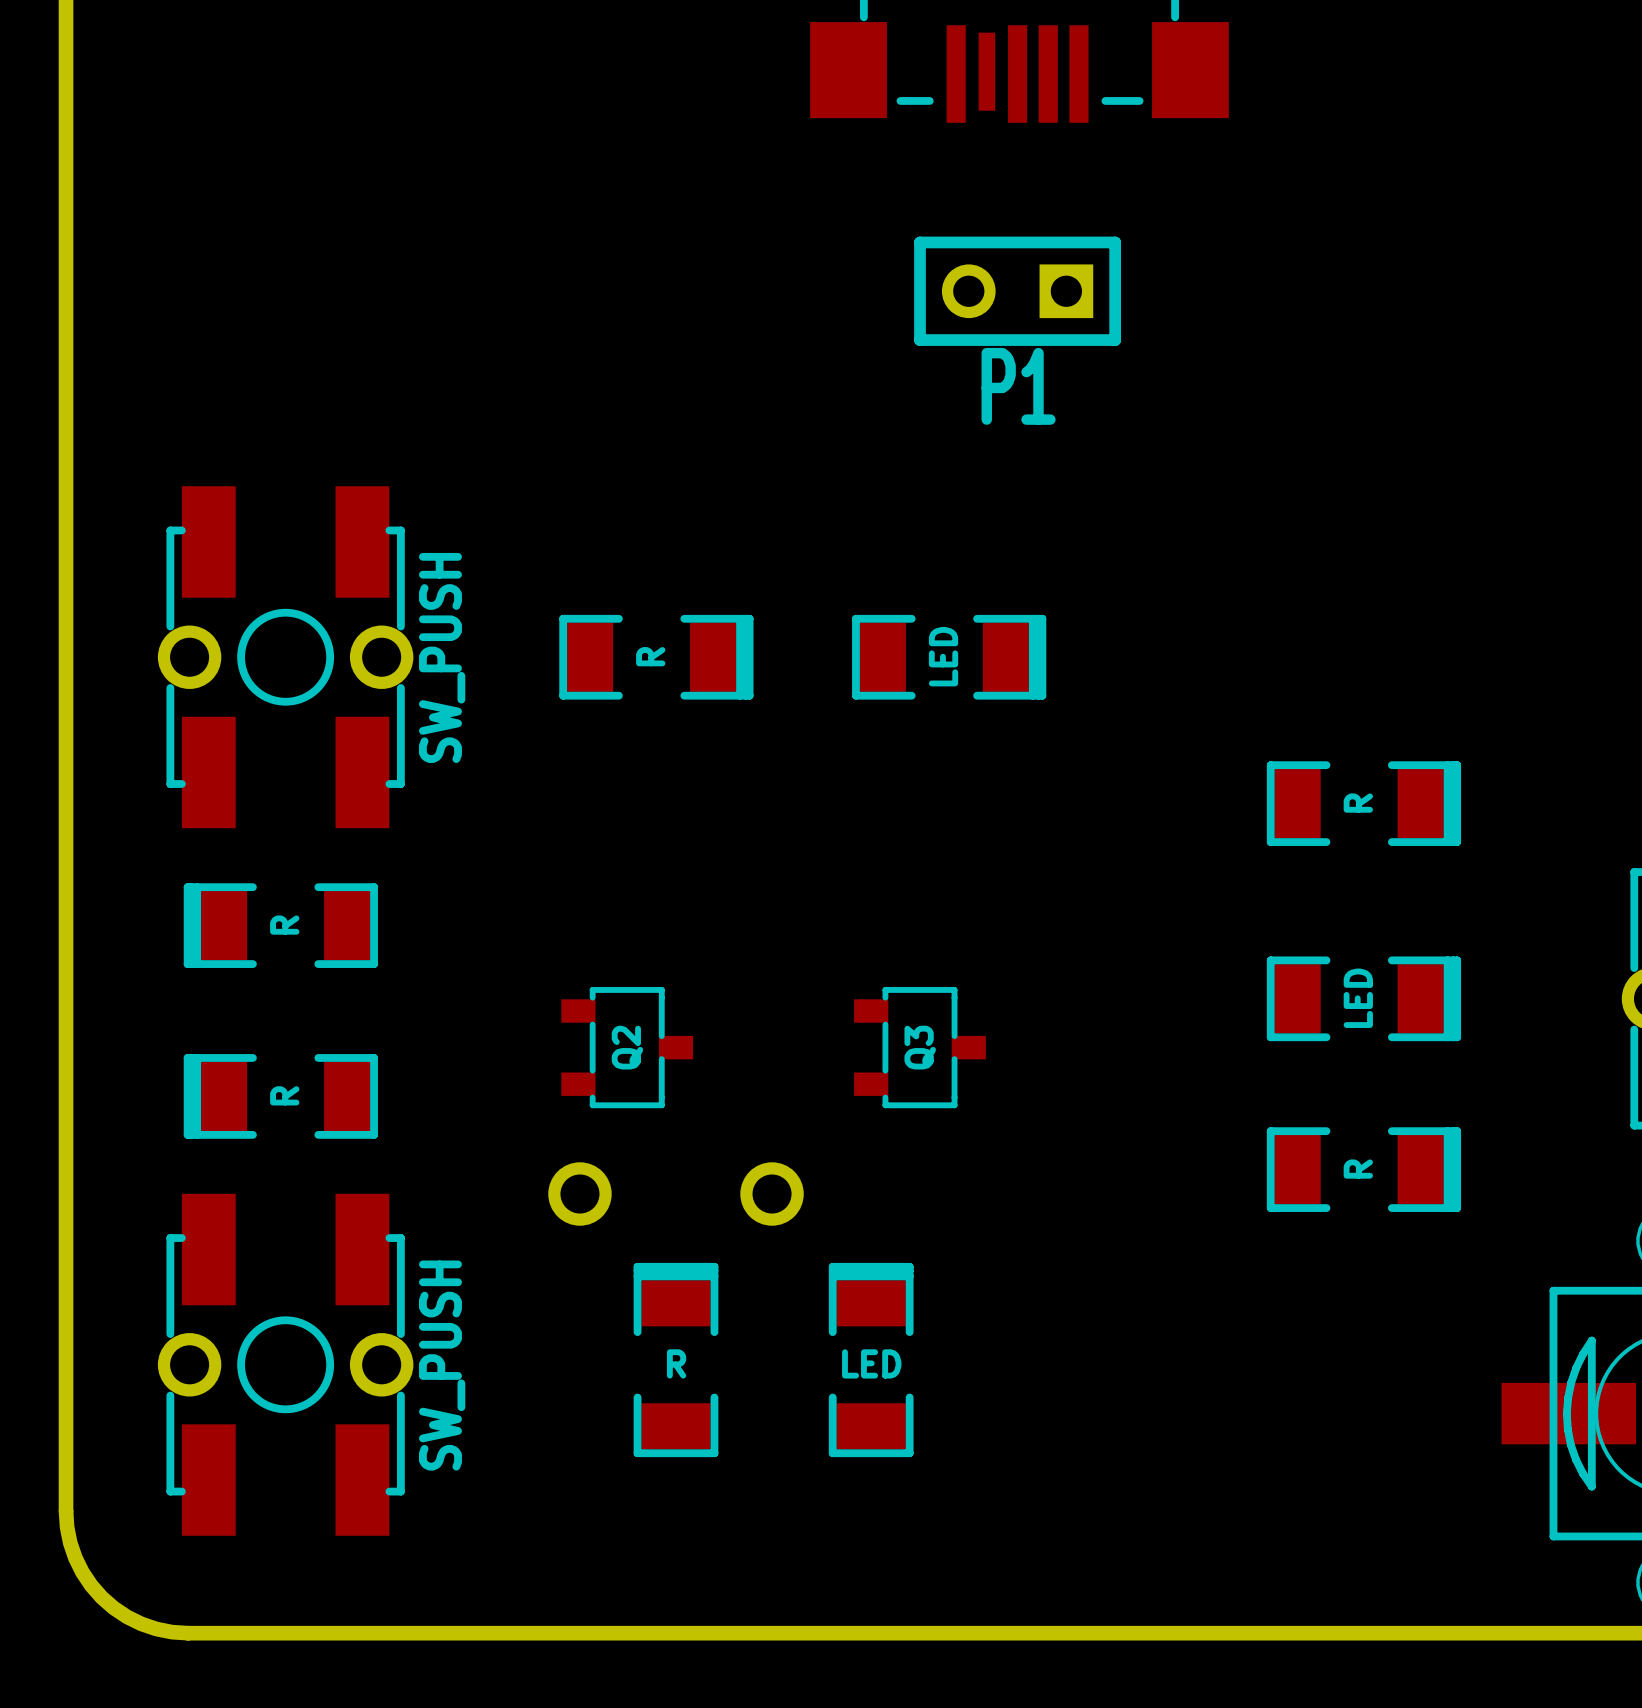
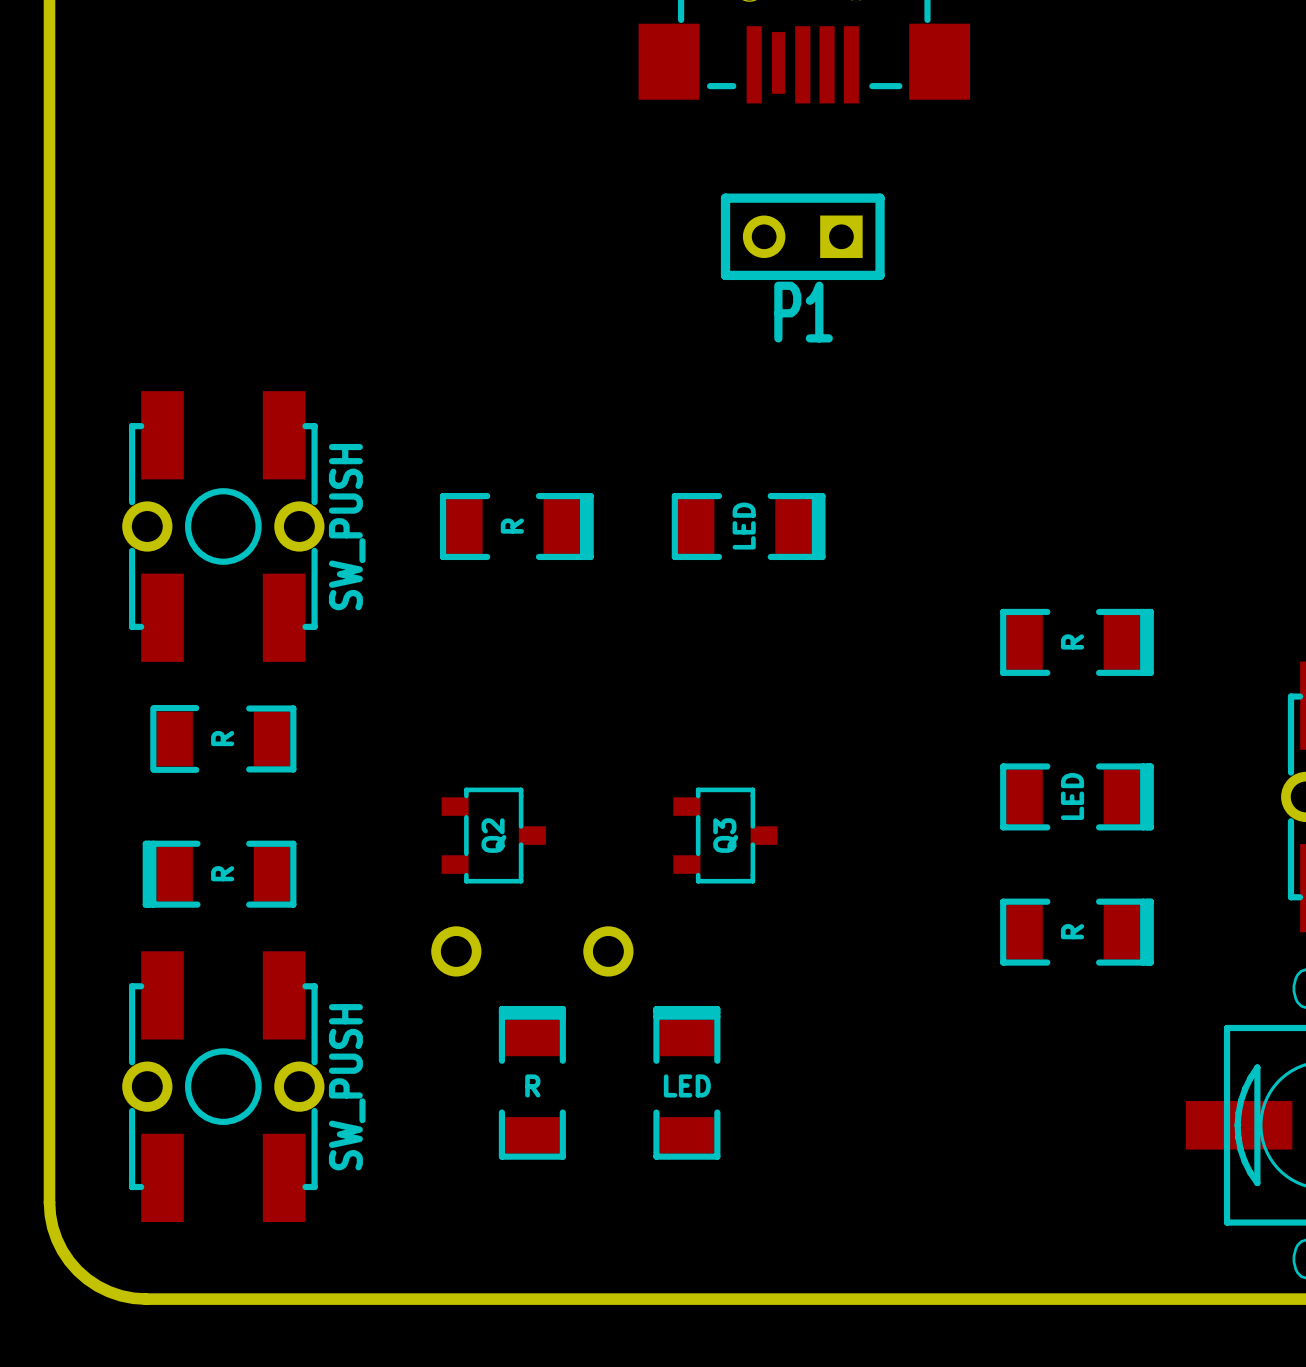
part footprint: [183, 883, 378, 968] -> [150, 705, 297, 773]

